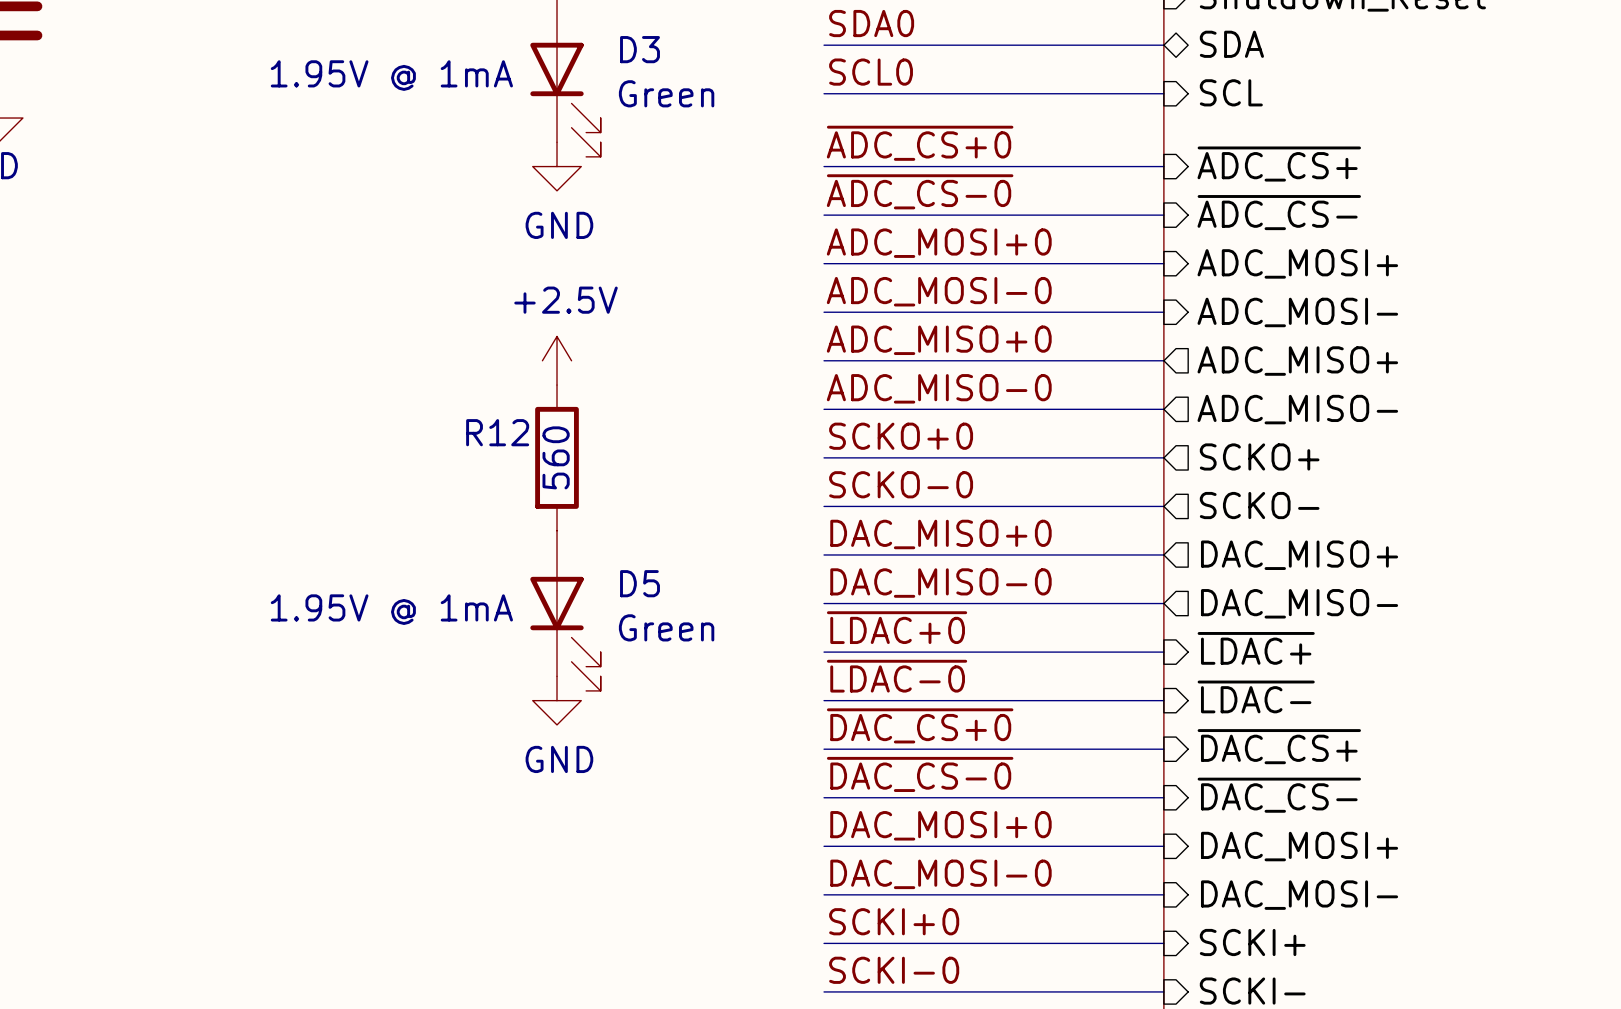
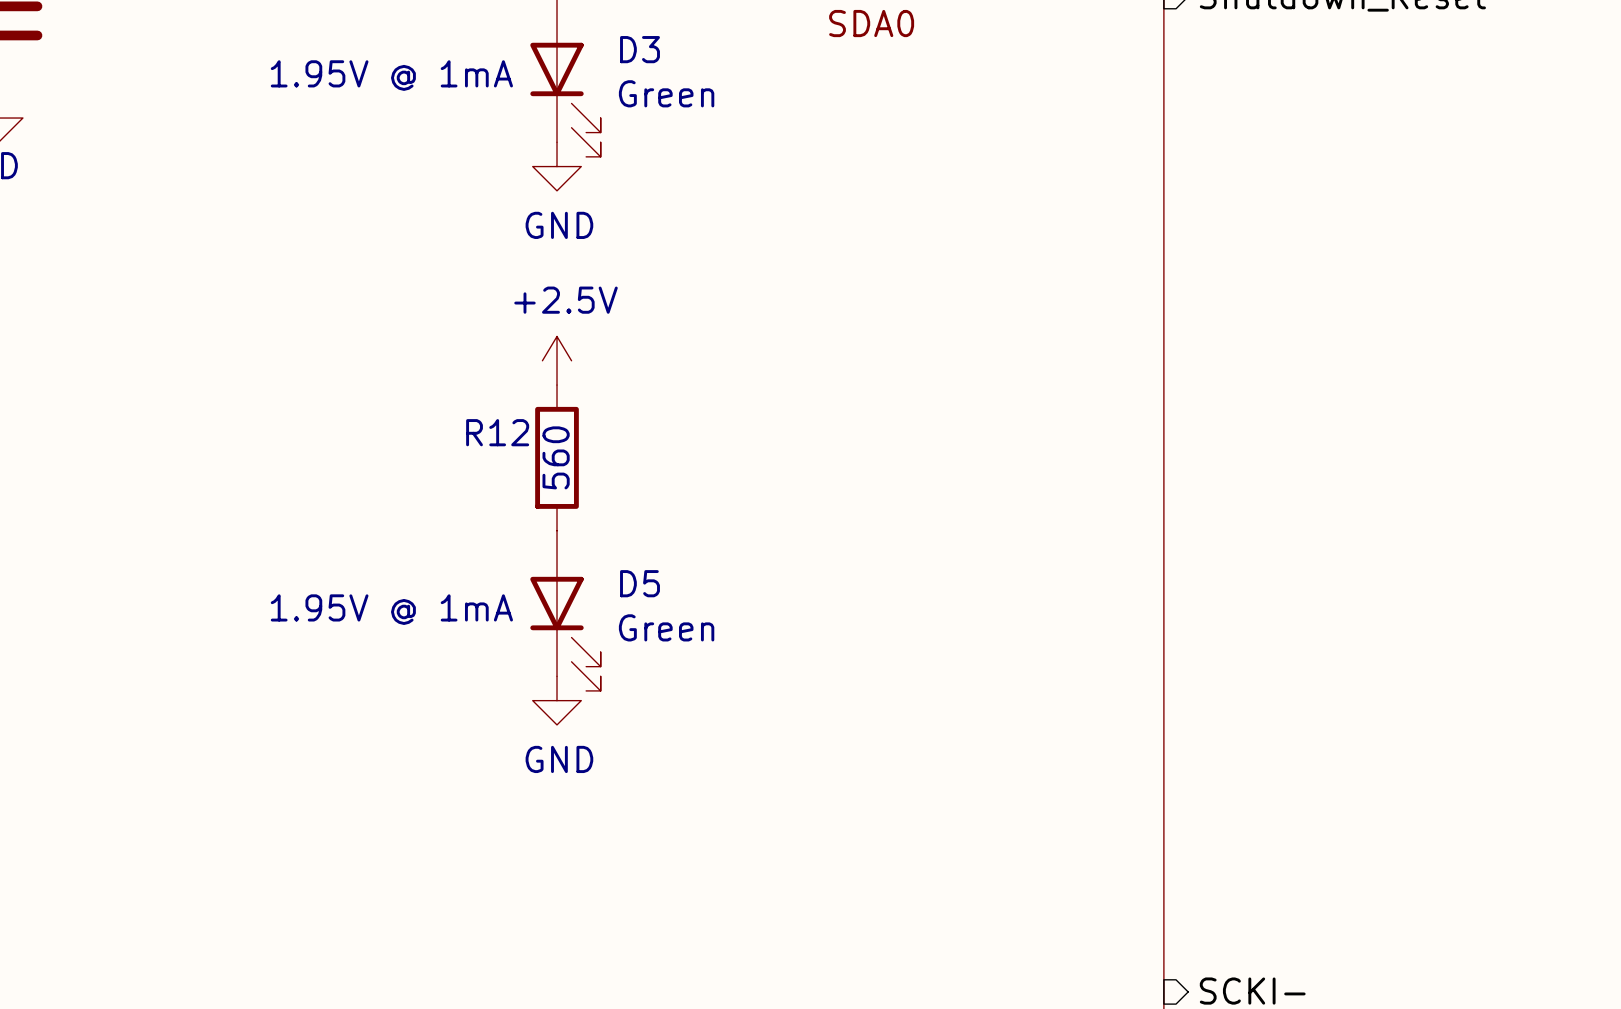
sheet pin: SDA (1231, 44) -> none
wire: (824, 45) (1163, 45) -> none
label: SCL0 (871, 72) -> none
sheet pin: SCL (1231, 92) -> none
wire: (824, 93) (1163, 93) -> none
label: ~{ADC_CS+0} (920, 143) -> none
sheet pin: ~{ADC_CS+} (1279, 164) -> none
wire: (824, 166) (1163, 166) -> none
label: ~{ADC_CS-0} (920, 191) -> none
sheet pin: ~{ADC_CS-} (1279, 212) -> none
wire: (824, 215) (1163, 215) -> none
label: ADC_MOSI+0 (939, 243) -> none
wire: (824, 263) (1163, 263) -> none
sheet pin: ADC_MOSI+ (1297, 263) -> none
label: ADC_MOSI-0 (939, 291) -> none
wire: (824, 312) (1163, 312) -> none
sheet pin: ADC_MOSI- (1297, 312) -> none
label: ADC_MISO+0 (939, 340) -> none
wire: (824, 360) (1163, 360) -> none
sheet pin: ADC_MISO+ (1297, 361) -> none
label: ADC_MISO-0 (939, 388) -> none
wire: (824, 409) (1163, 409) -> none
sheet pin: ADC_MISO- (1297, 409) -> none
label: SCKO+0 (901, 436) -> none
sheet pin: SCKO+ (1259, 456) -> none
wire: (824, 457) (1163, 457) -> none
label: SCKO-0 (901, 484) -> none
sheet pin: SCKO- (1259, 505) -> none
wire: (824, 506) (1163, 506) -> none
label: DAC_MISO+0 (940, 534) -> none
wire: (824, 554) (1163, 554) -> none
sheet pin: DAC_MISO+ (1299, 555) -> none
label: DAC_MISO-0 (940, 583) -> none
wire: (824, 603) (1163, 603) -> none
sheet pin: DAC_MISO- (1299, 603) -> none
label: ~{LDAC+0} (897, 627) -> none
sheet pin: ~{LDAC+} (1256, 648) -> none
wire: (824, 652) (1163, 652) -> none
label: ~{LDAC-0} (897, 676) -> none
sheet pin: ~{LDAC-} (1256, 696) -> none
wire: (824, 700) (1163, 700) -> none
label: ~{DAC_CS+0} (920, 725) -> none
sheet pin: ~{DAC_CS+} (1279, 746) -> none
wire: (824, 749) (1163, 749) -> none
label: ~{DAC_CS-0} (920, 774) -> none
sheet pin: ~{DAC_CS-} (1279, 795) -> none
wire: (824, 797) (1163, 797) -> none
label: DAC_MOSI+0 (940, 825) -> none
wire: (824, 846) (1163, 846) -> none
sheet pin: DAC_MOSI+ (1299, 846) -> none
label: DAC_MOSI-0 (940, 874) -> none
wire: (824, 894) (1163, 894) -> none
sheet pin: DAC_MOSI- (1299, 895) -> none
label: SCKI+0 (894, 921) -> none
sheet pin: SCKI+ (1252, 942) -> none
wire: (824, 943) (1163, 943) -> none
label: SCKI-0 (894, 970) -> none
wire: (824, 991) (1163, 991) -> none

